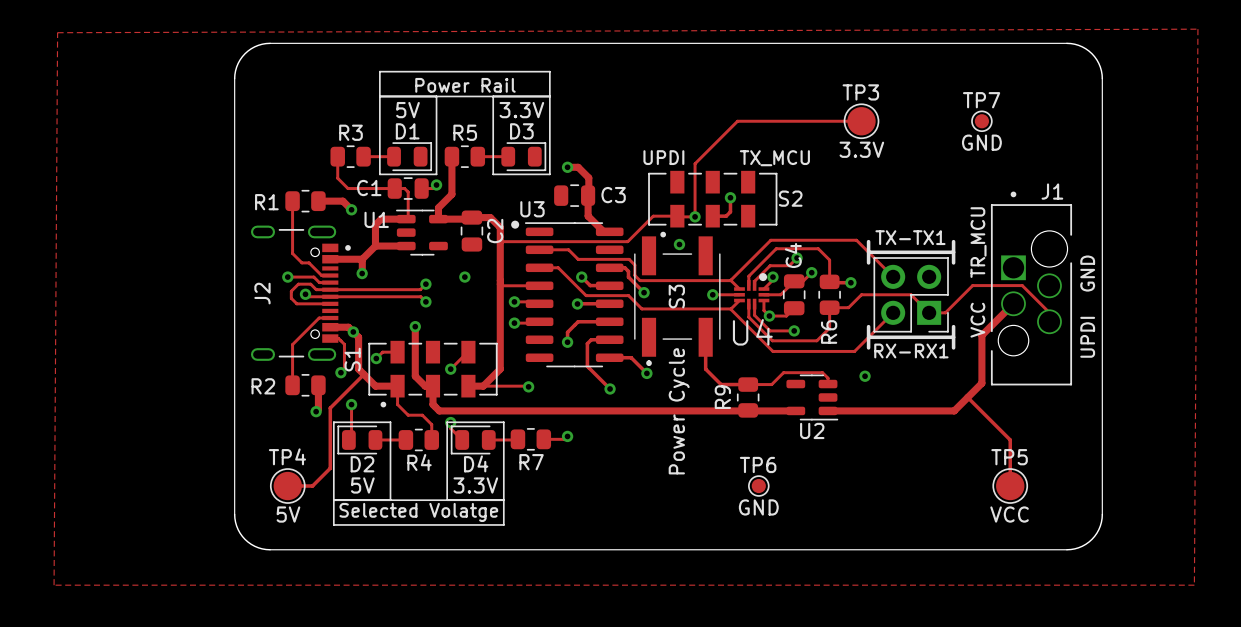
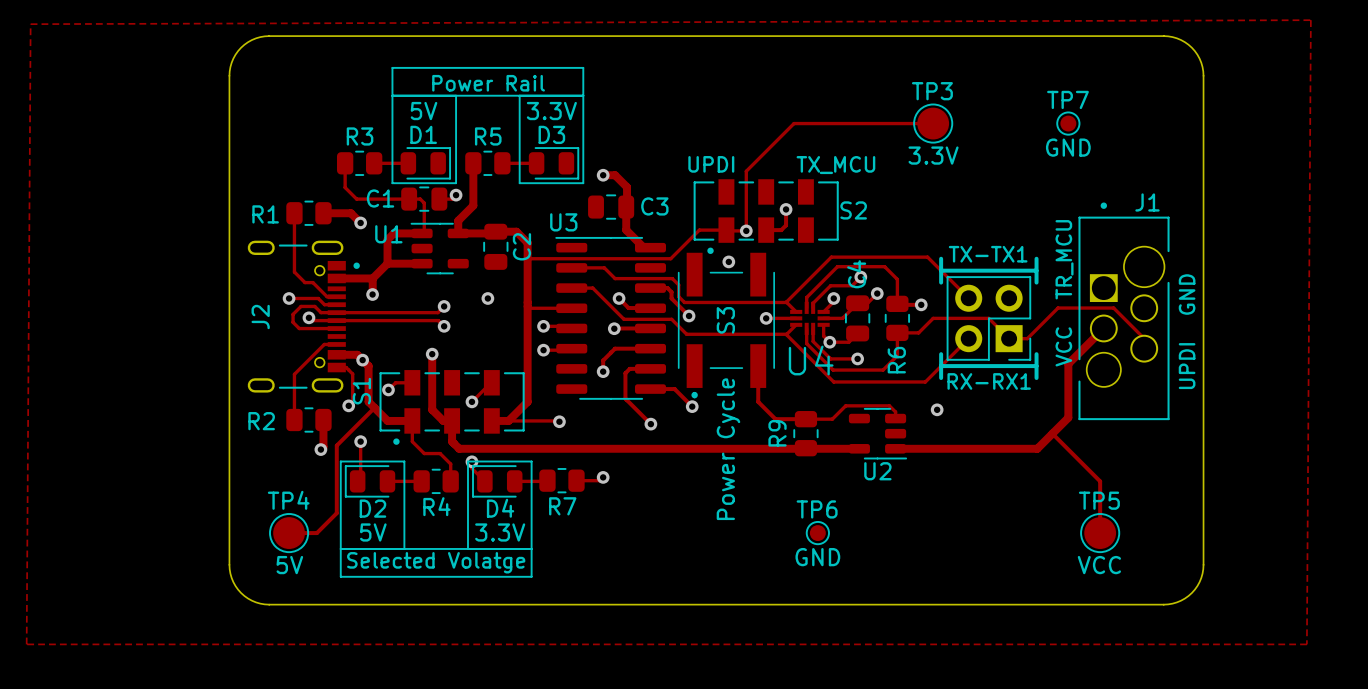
drawing: [511, 220, 520, 229] -> none
drawing: [759, 273, 768, 282] -> none

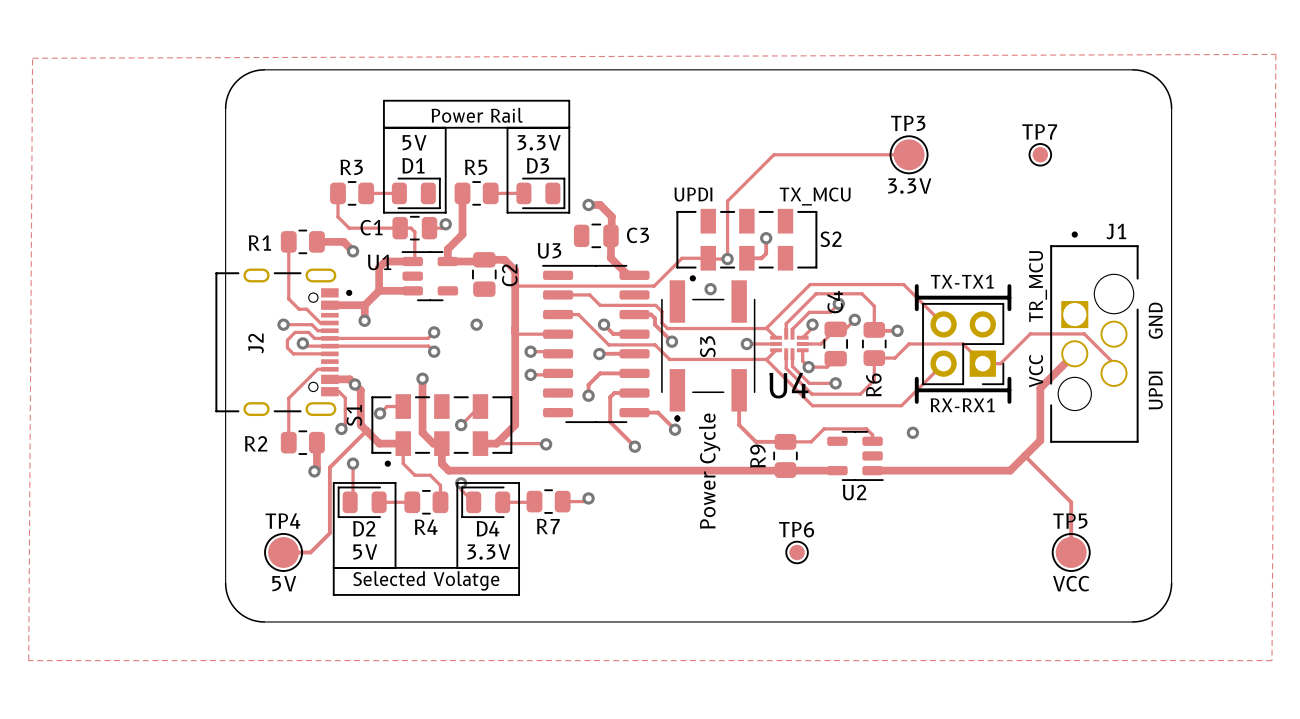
TP7 value: GND (1068, 147) -> none
J2 footprint: [247, 240, 360, 393] -> [215, 268, 353, 417]
TP6 value: GND (817, 557) -> none

